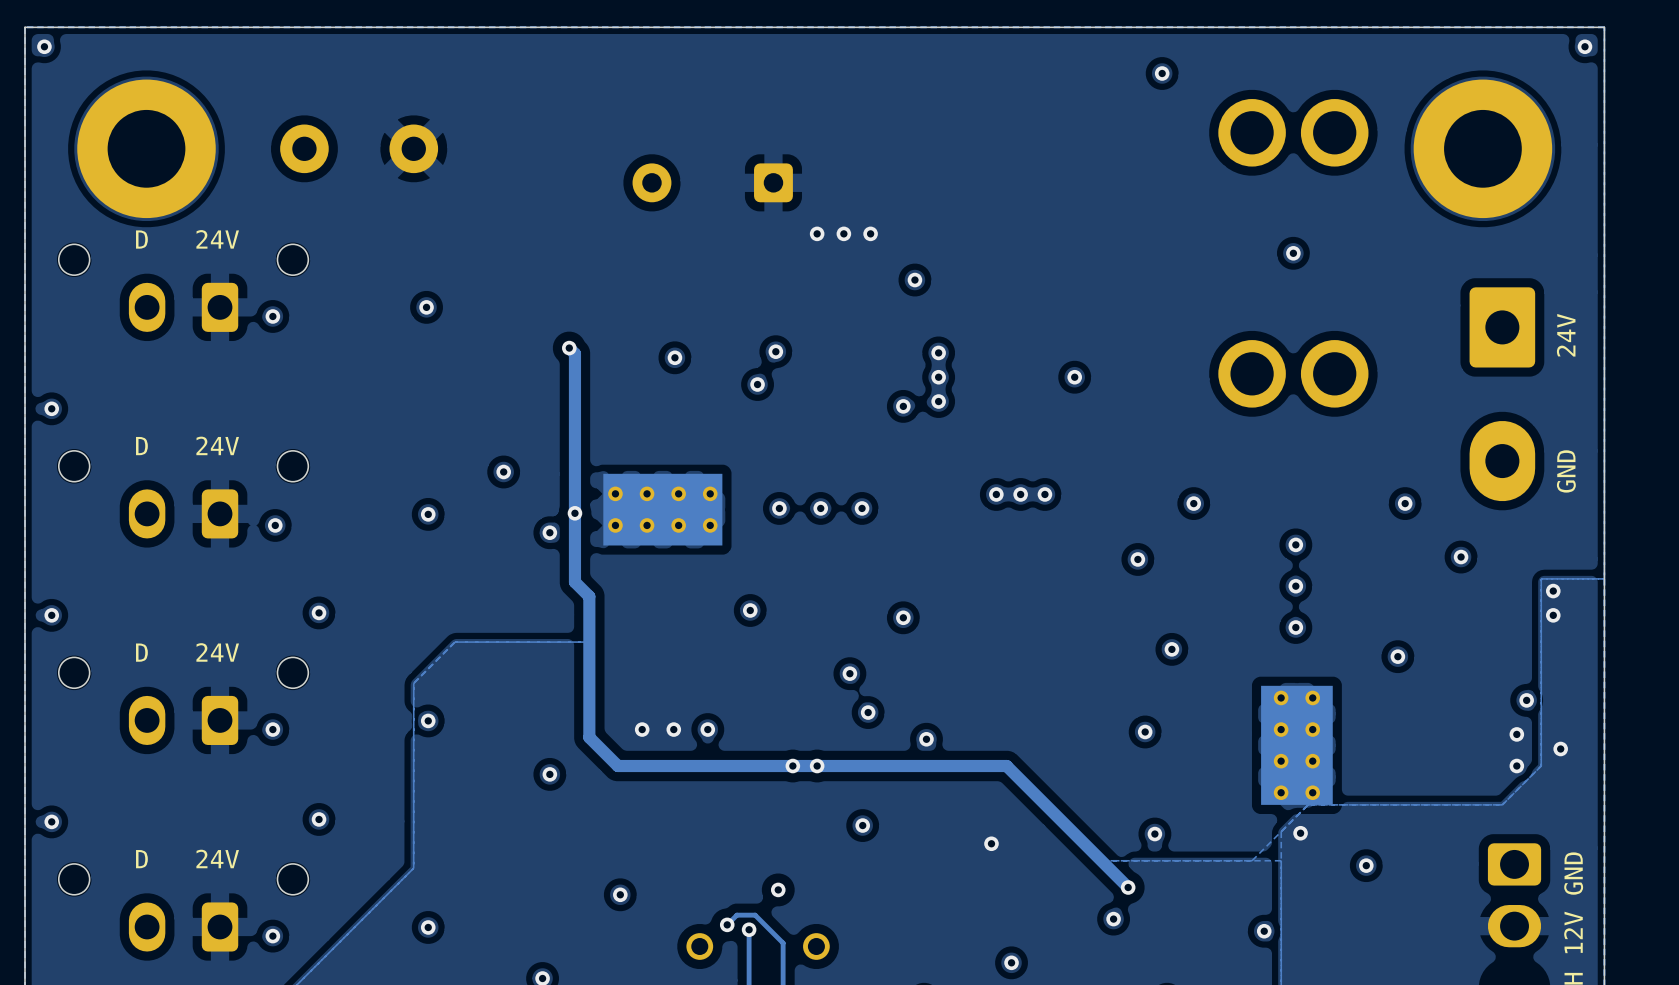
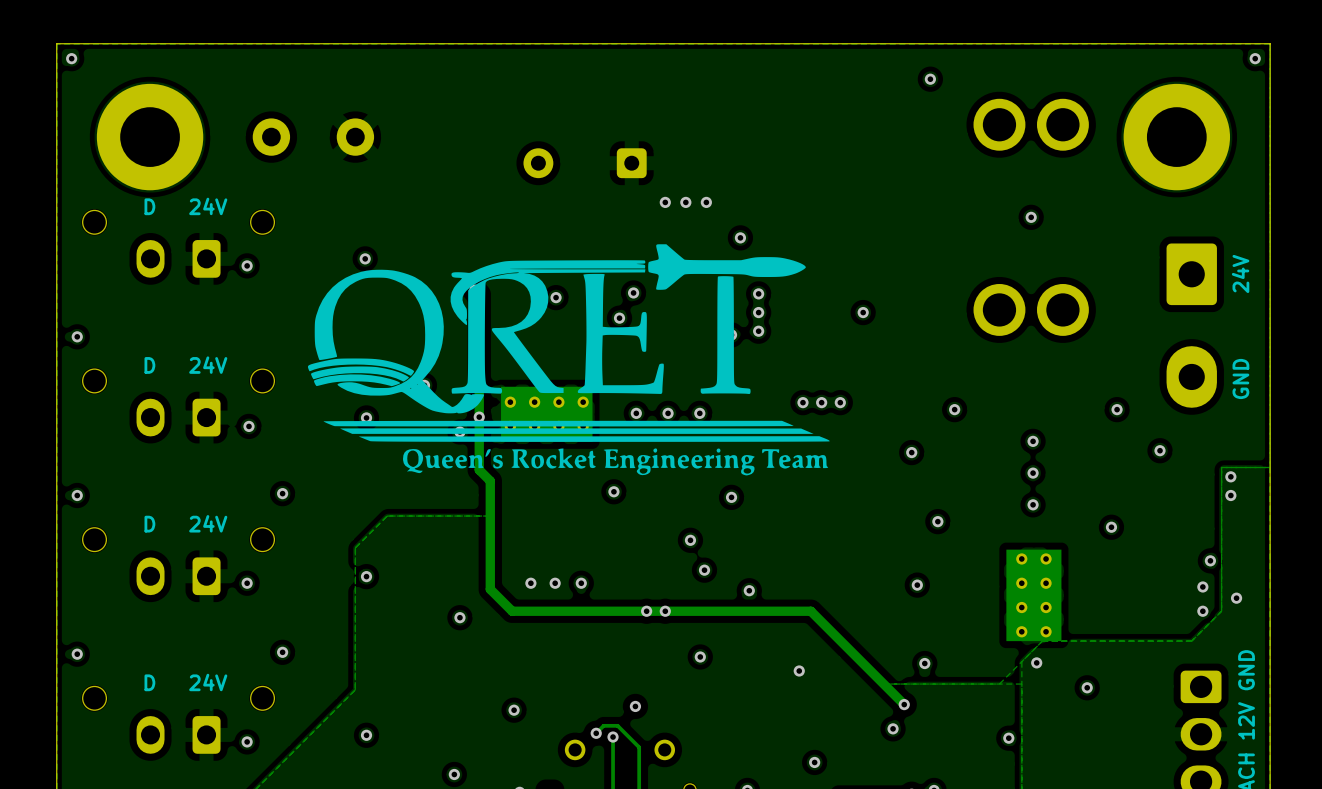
drawing: none -> [307, 244, 830, 476]

